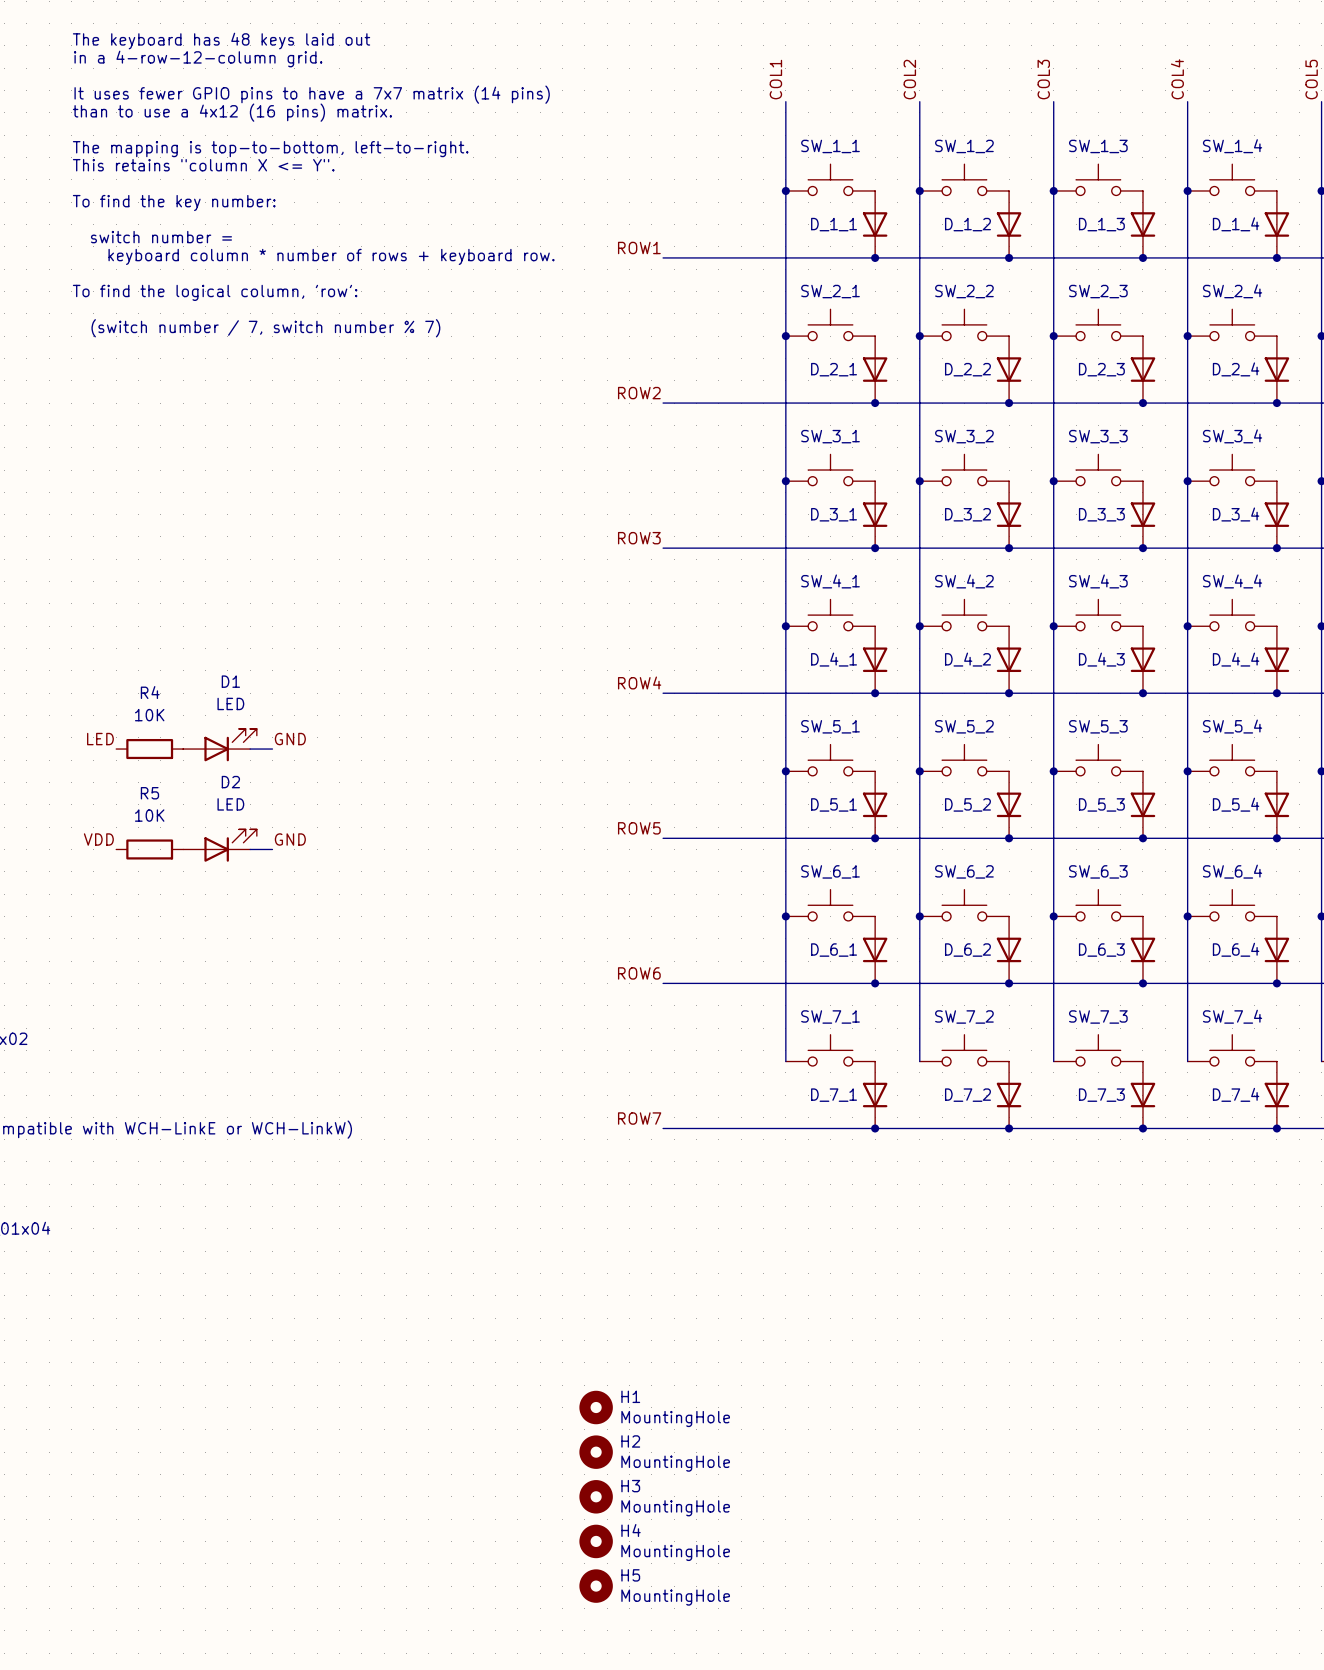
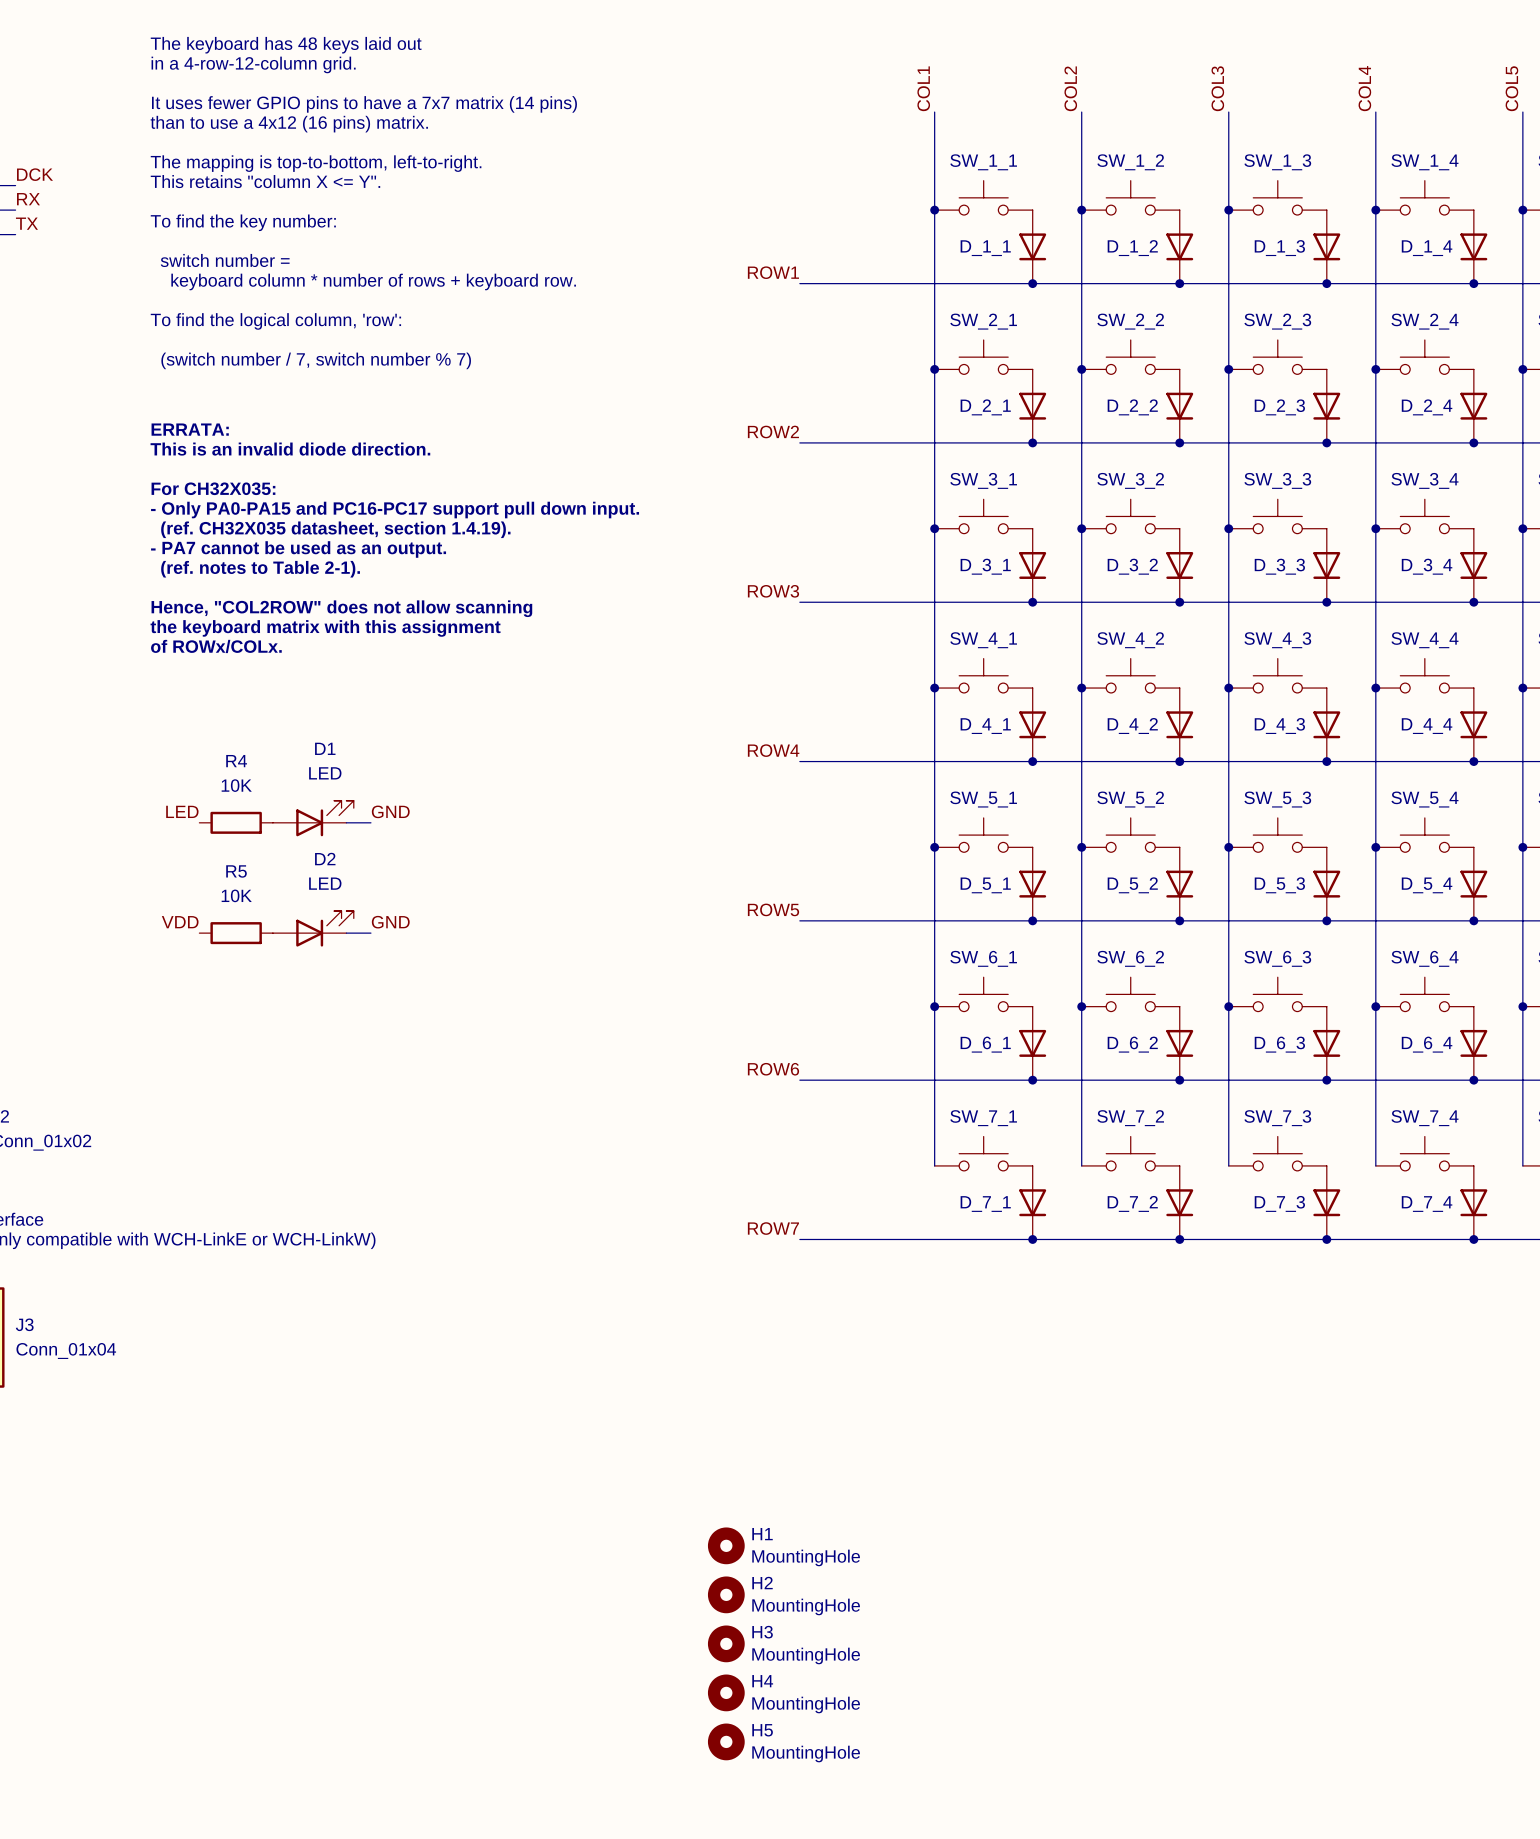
text: none -> ERRATA: (190, 429)
text: none -> This is an invalid diode direction. (290, 449)
text: none -> For CH32X035: (213, 488)
text: none -> - Only PA0-PA15 and PC16-PC17 support pull down input. (395, 510)
text: none -> (ref. CH32X035 datasheet, section 1.4.19). (335, 529)
text: none -> - PA7 cannot be used as an output. (298, 549)
text: none -> (ref. notes to Table 2-1). (260, 569)
text: none -> Hence, "COL2ROW" does not allow scanning (341, 608)
text: none -> the keyboard matrix with this assignment (325, 628)
text: none -> of ROWx/COLx. (216, 646)

